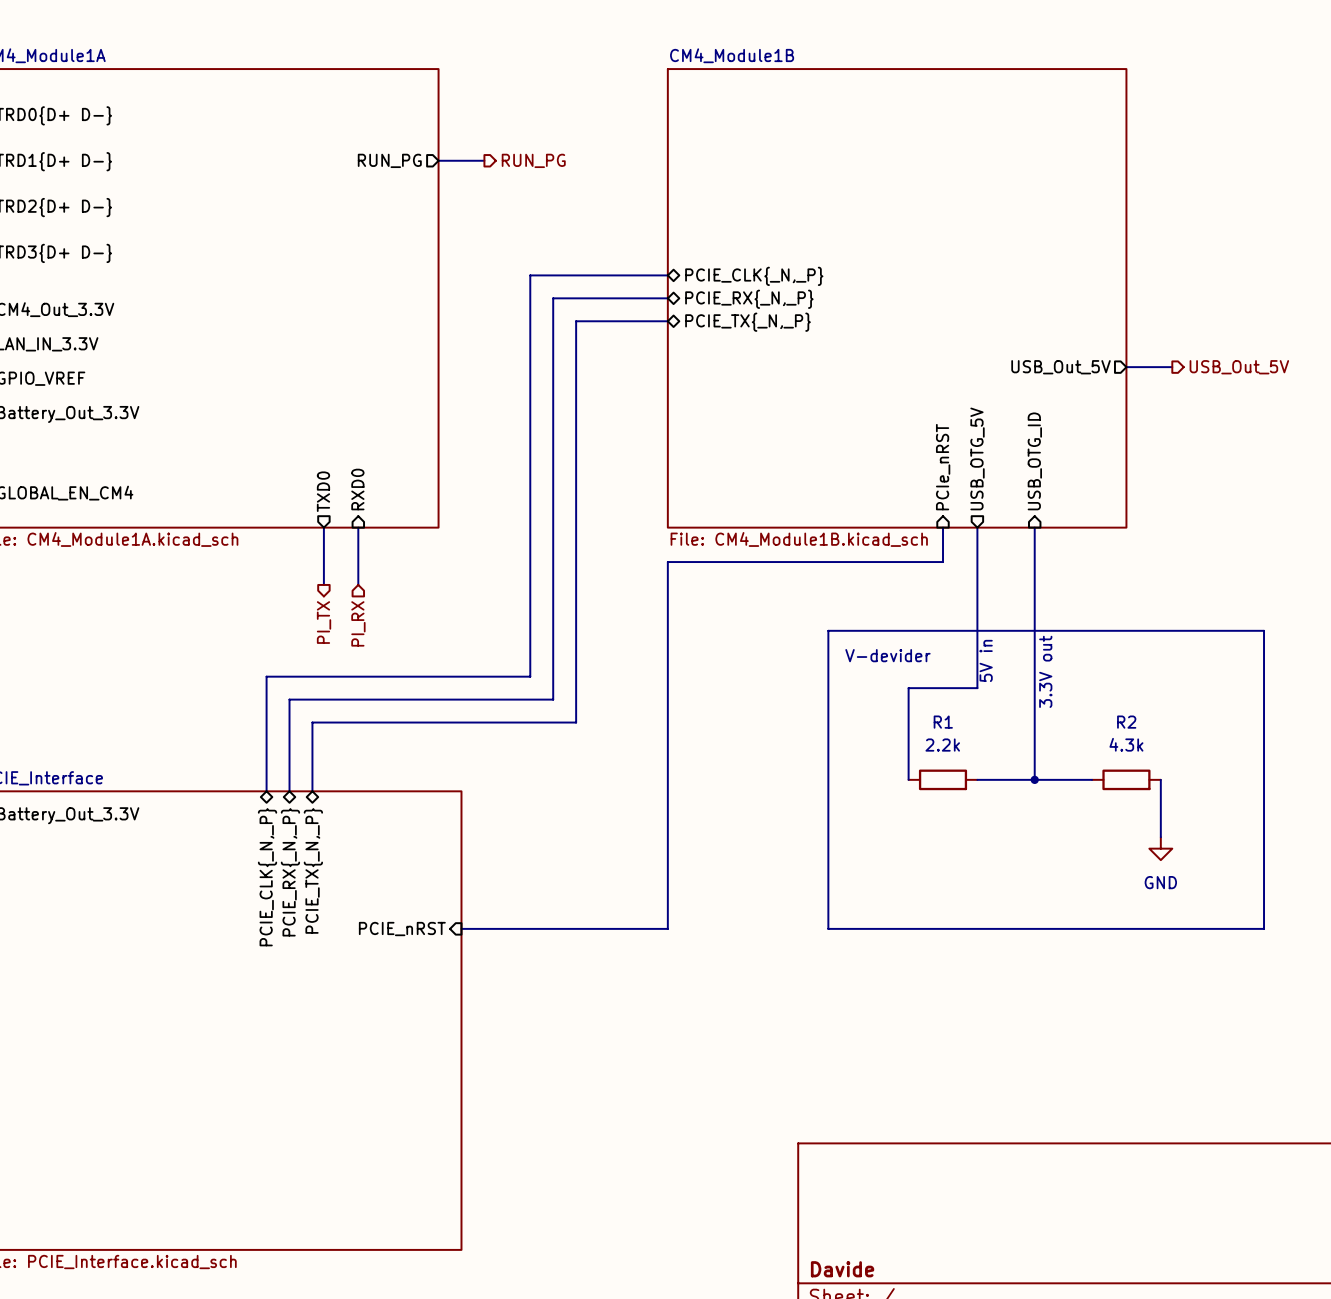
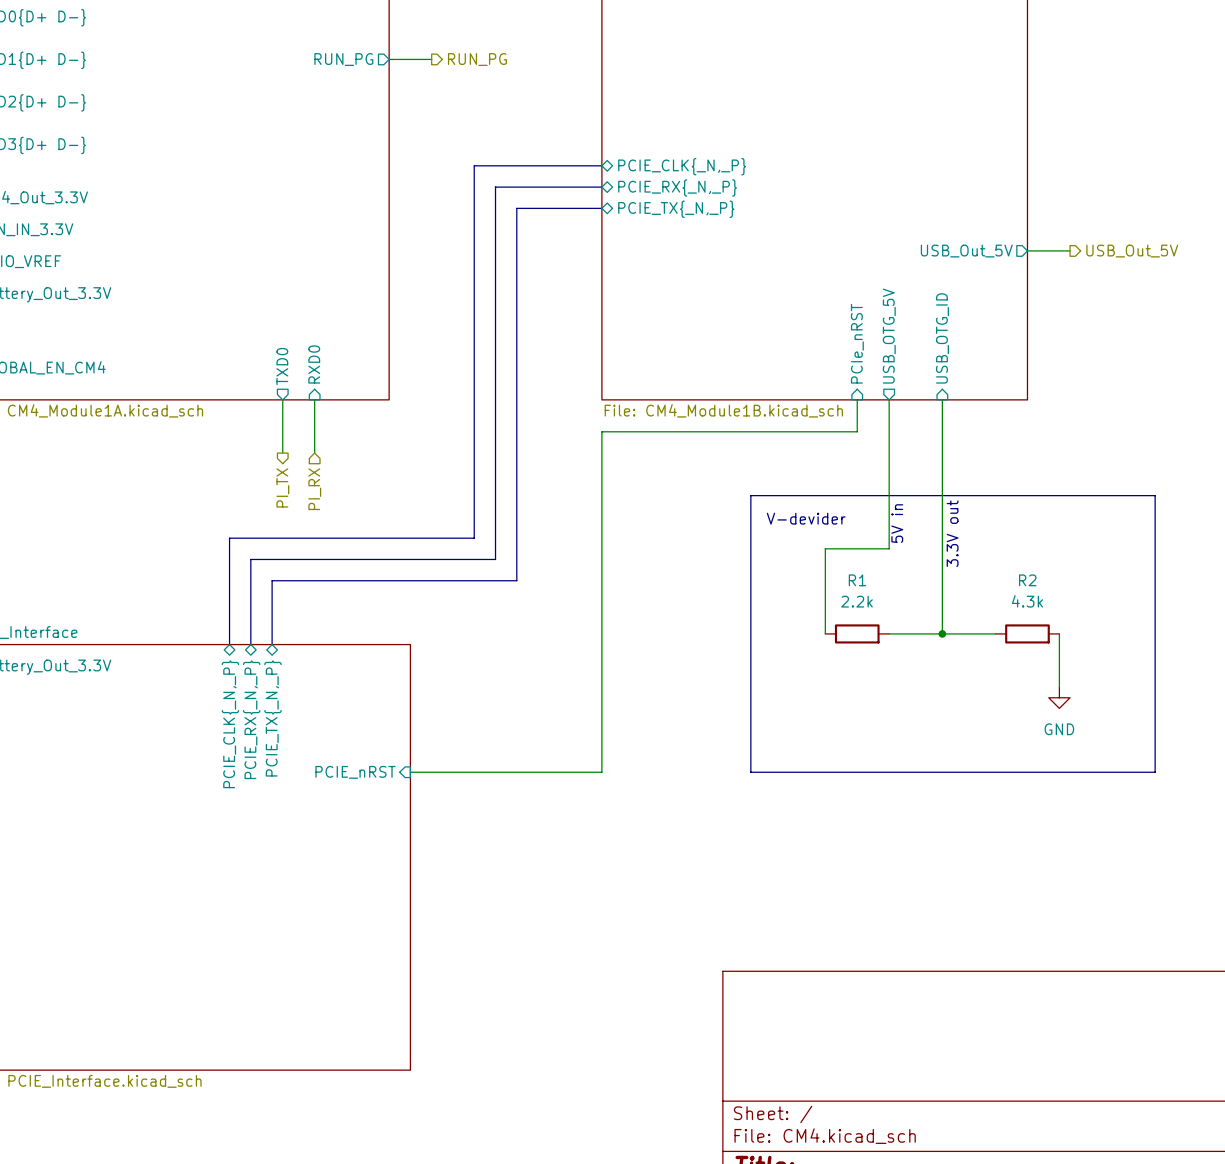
title block: Davide (842, 1269) -> none

